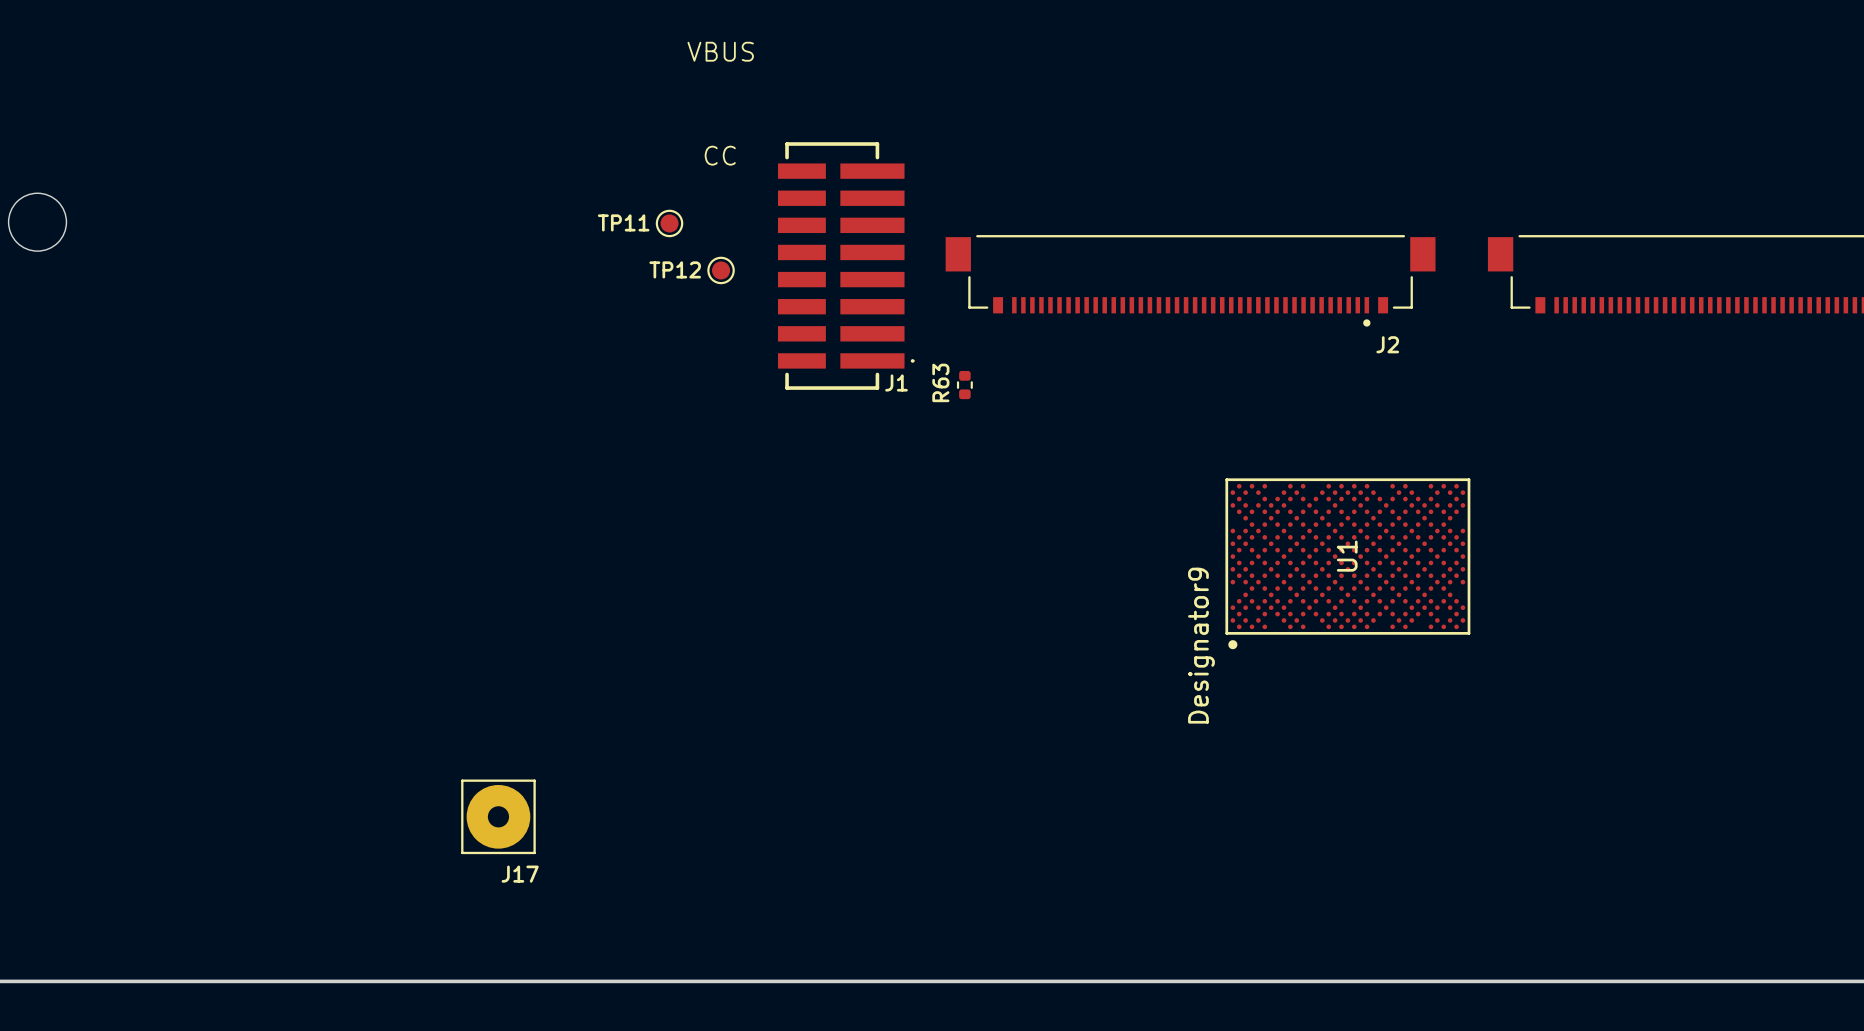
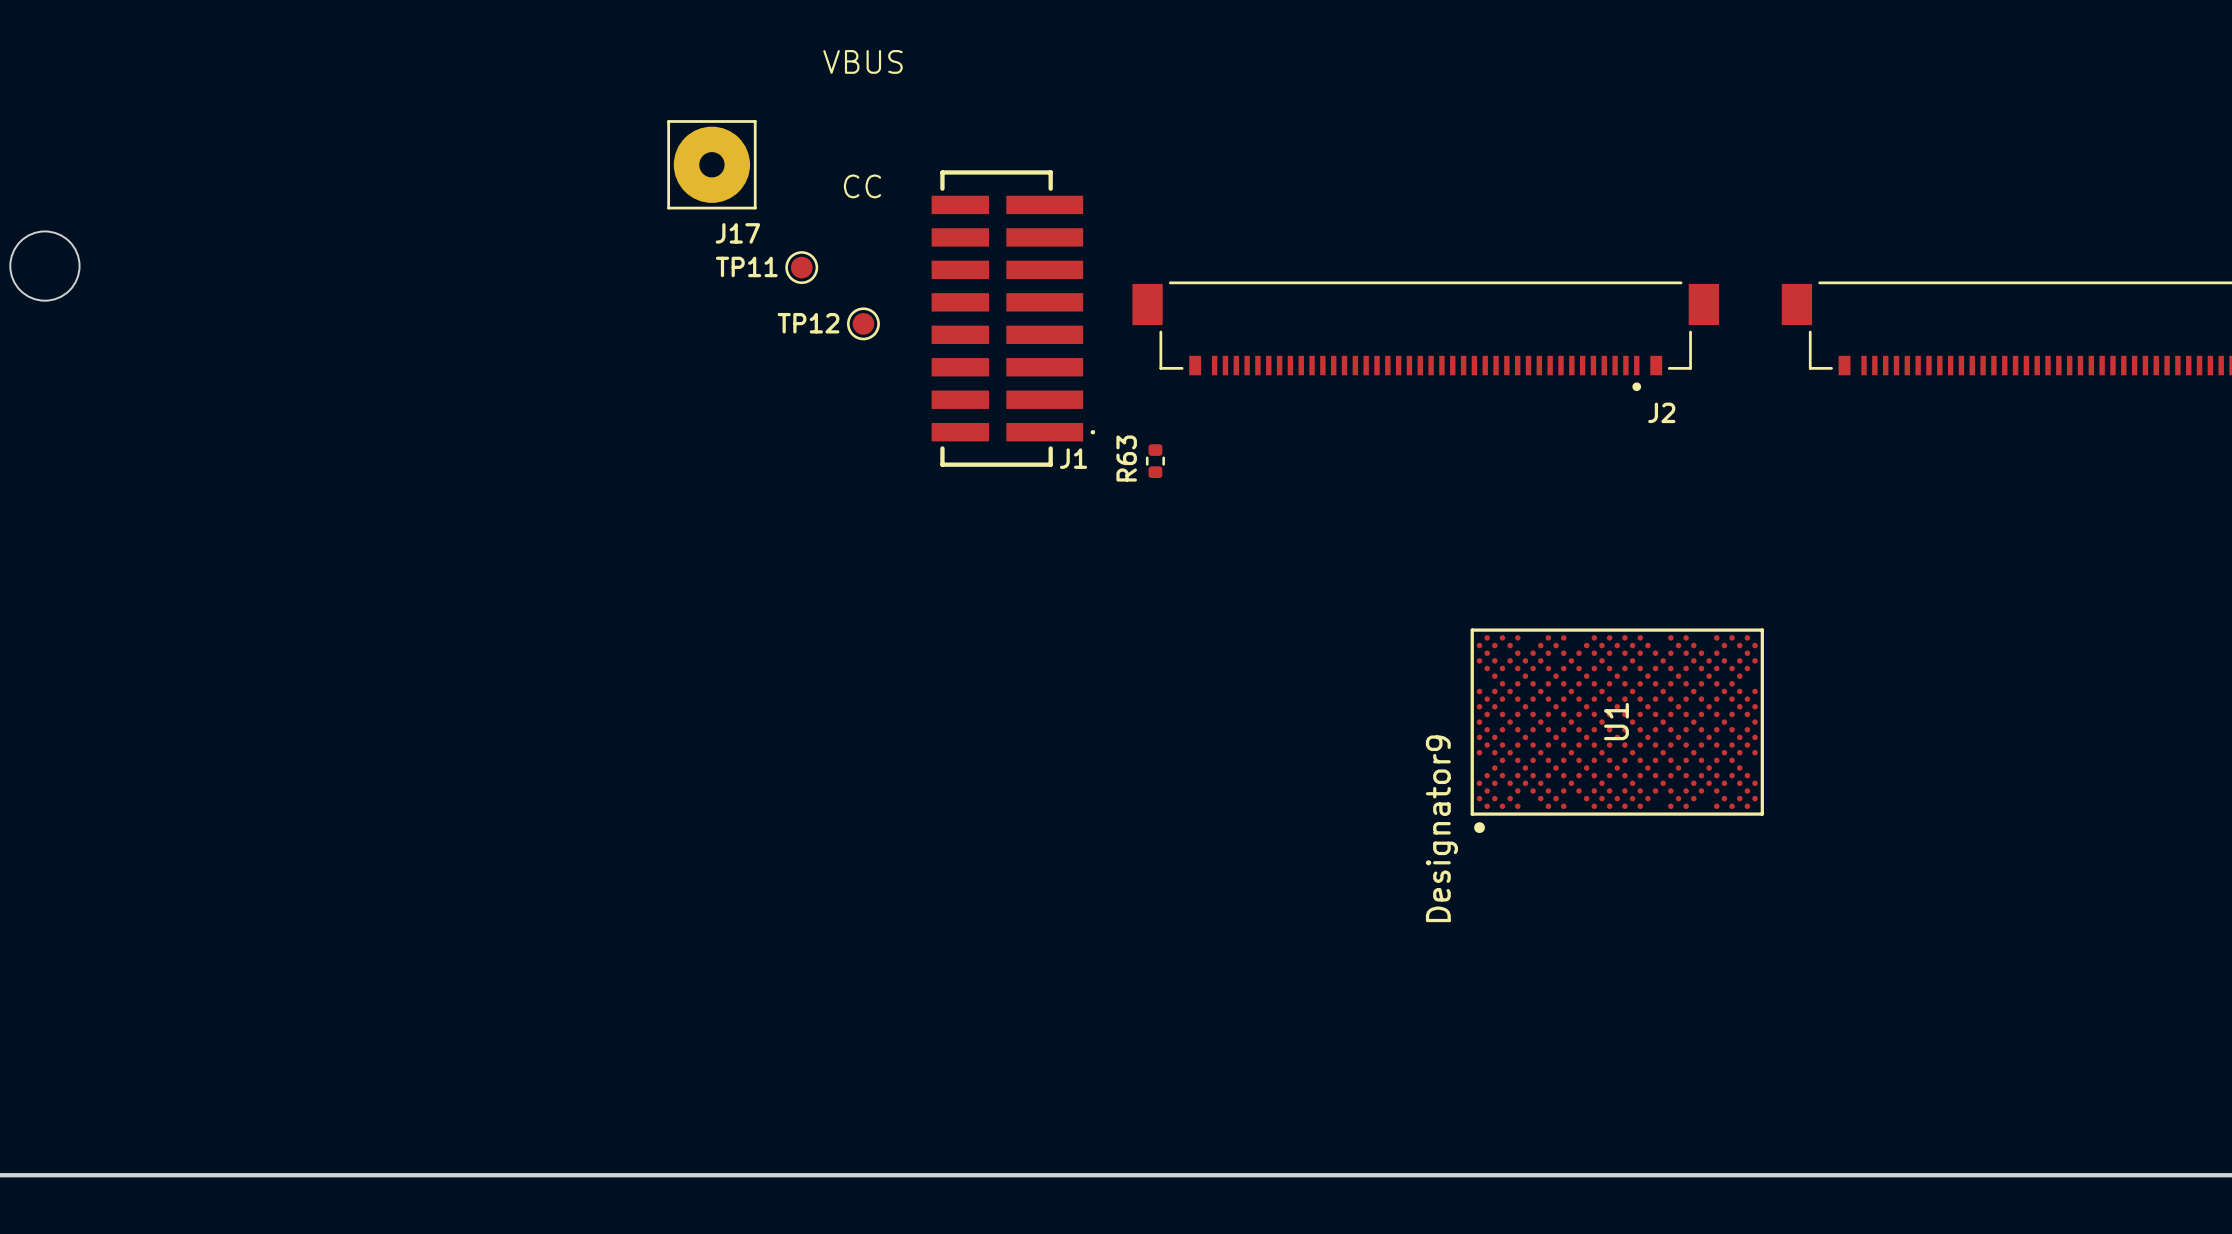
U1 position: (1347, 563) -> (1617, 730)
J17 position: (498, 816) -> (711, 164)

